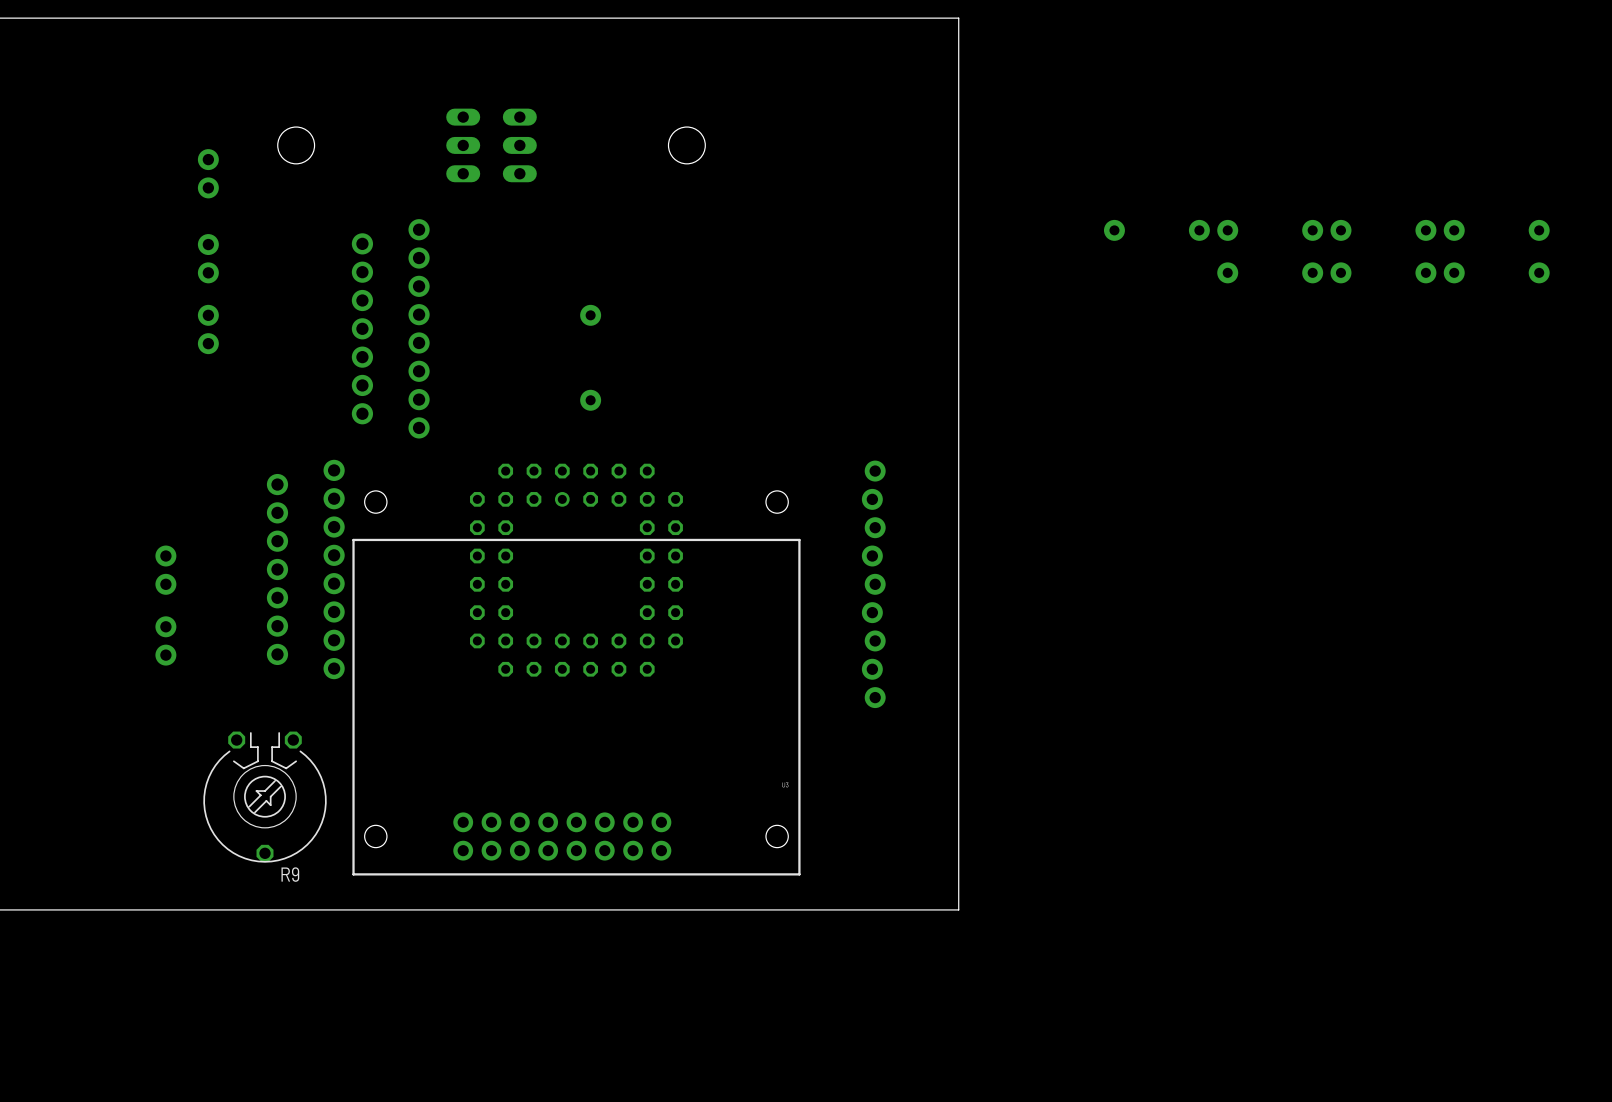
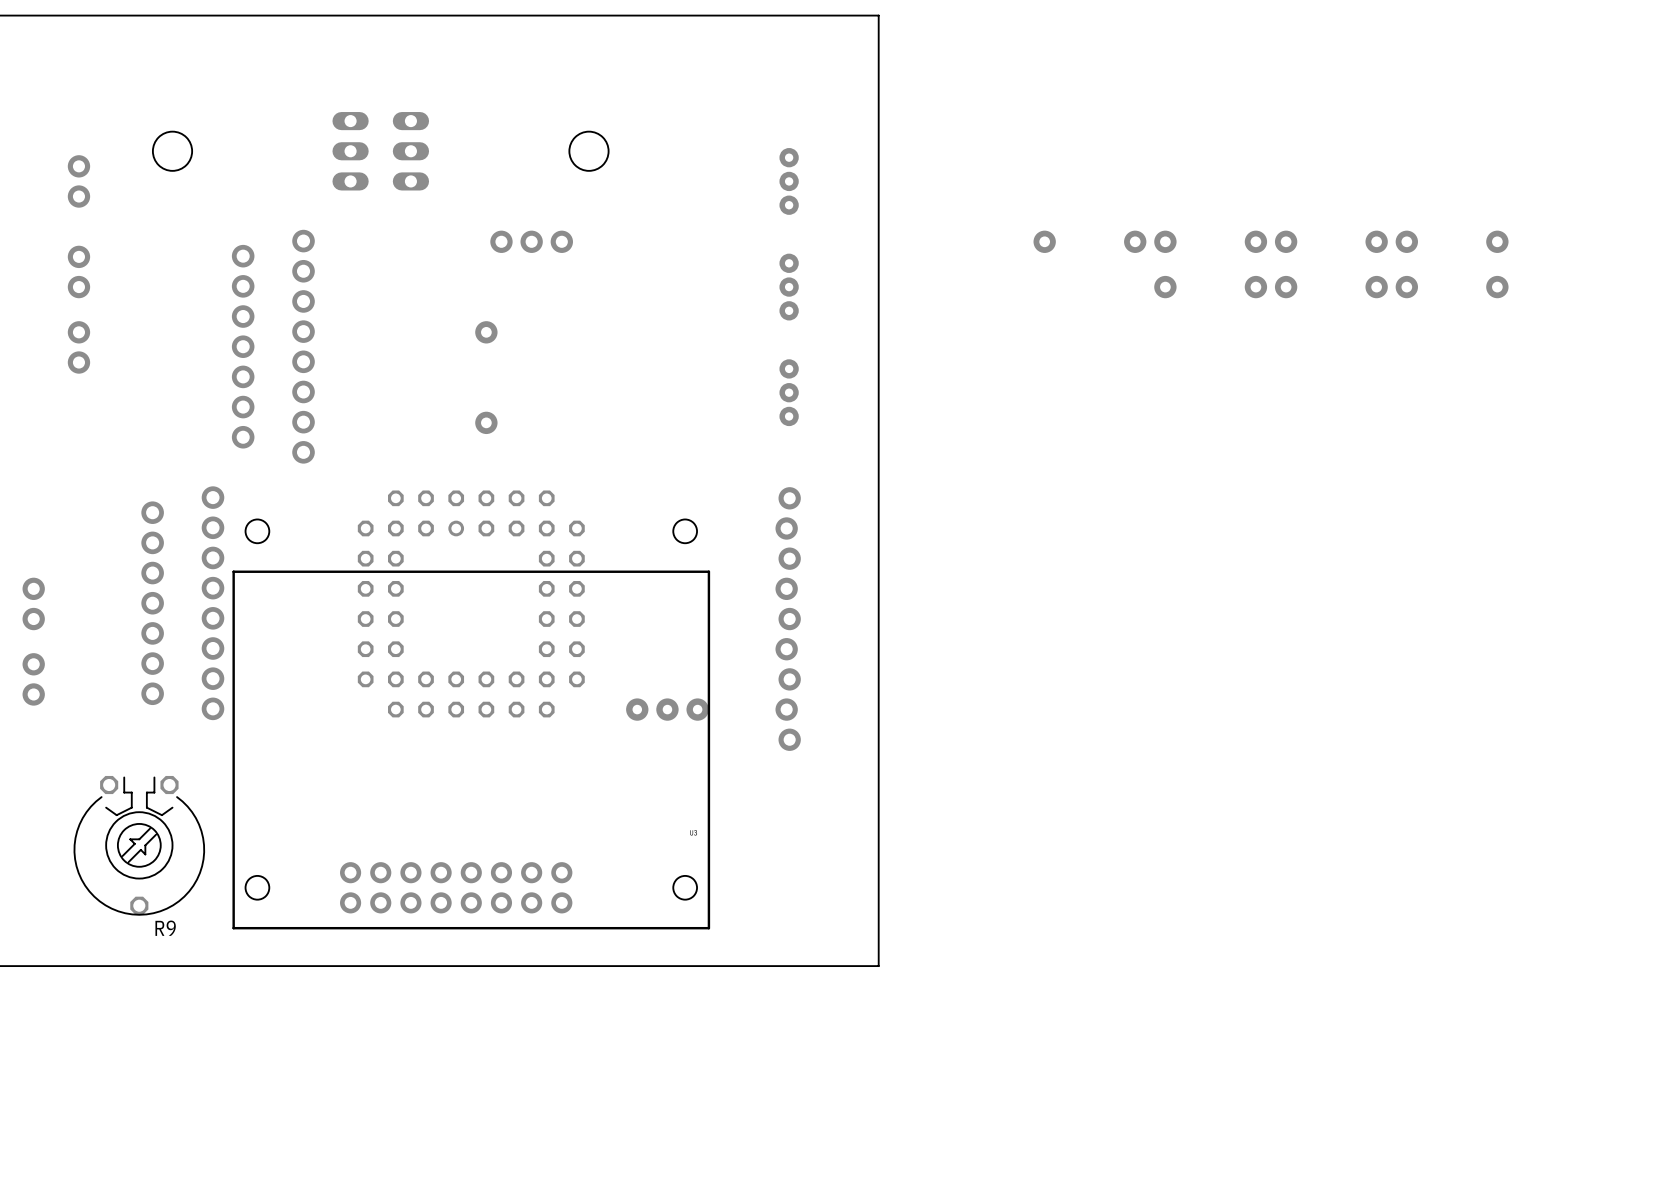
part: none -> (789, 181)
part: none -> (531, 241)
part: none -> (789, 287)
part: none -> (789, 392)
part: none -> (667, 709)

